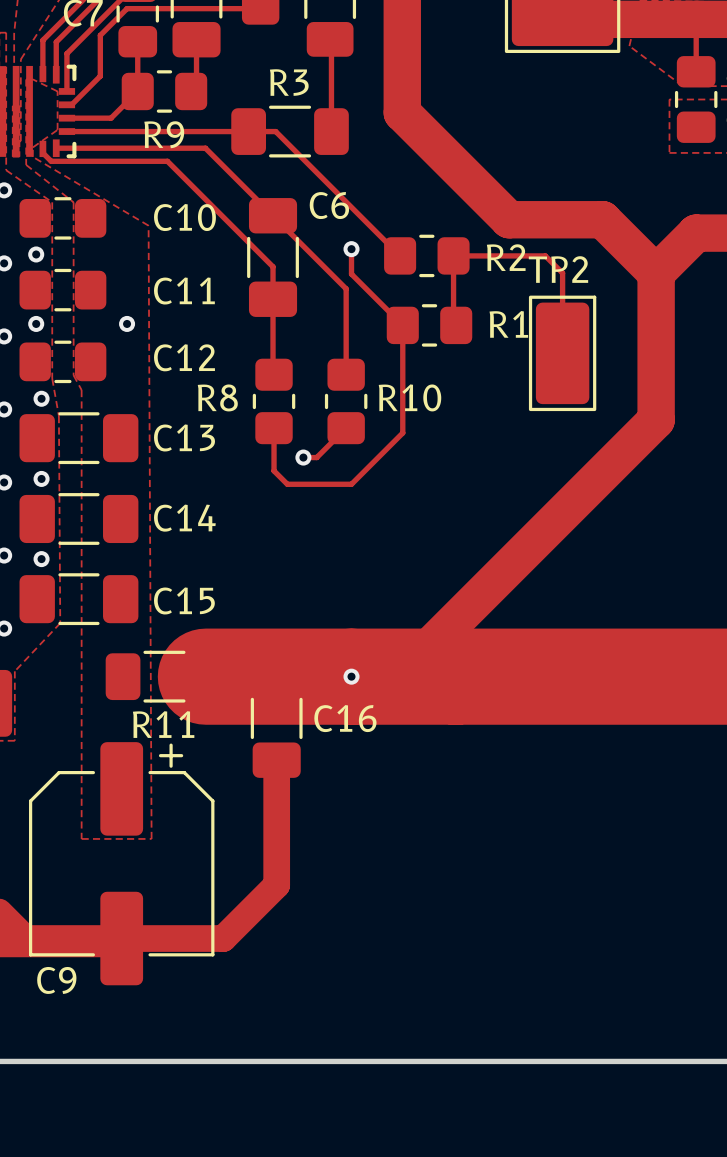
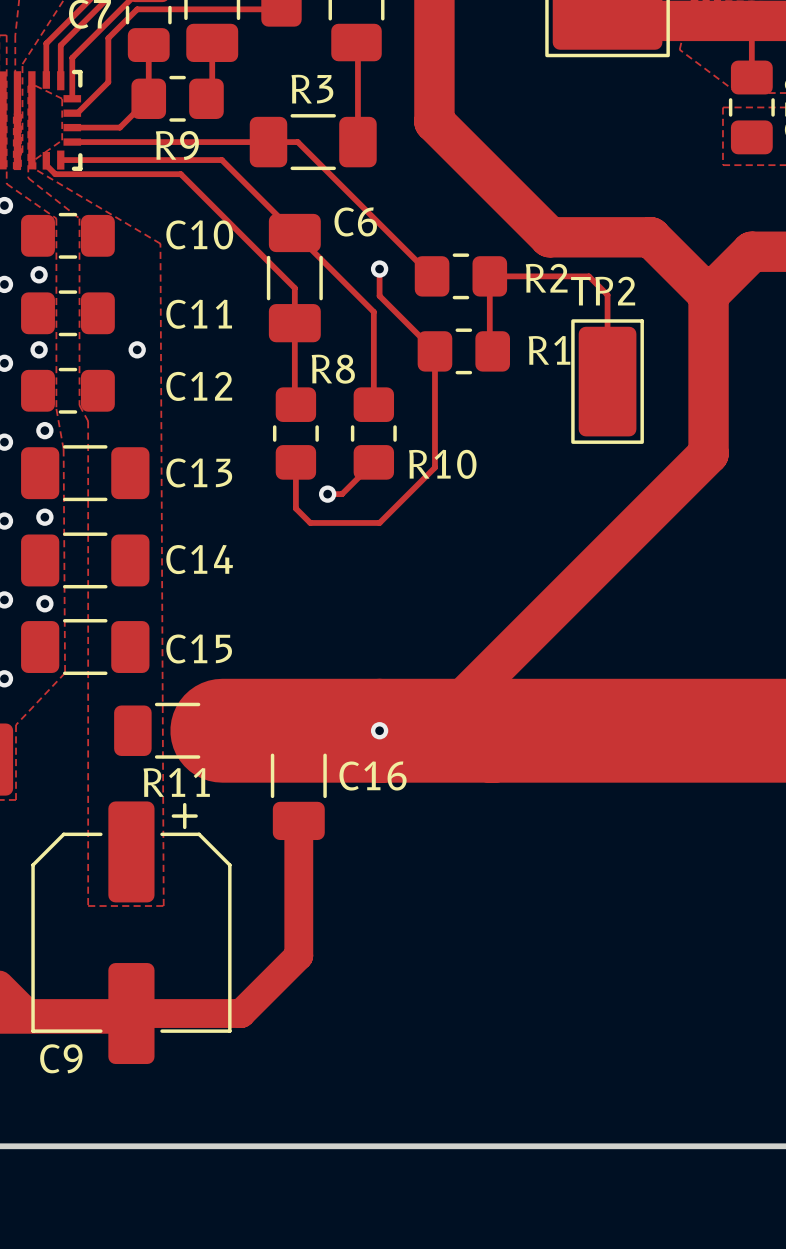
R8 name position: R8 (217, 397) -> R8 (333, 369)
R10 name position: R10 (409, 397) -> R10 (442, 464)

